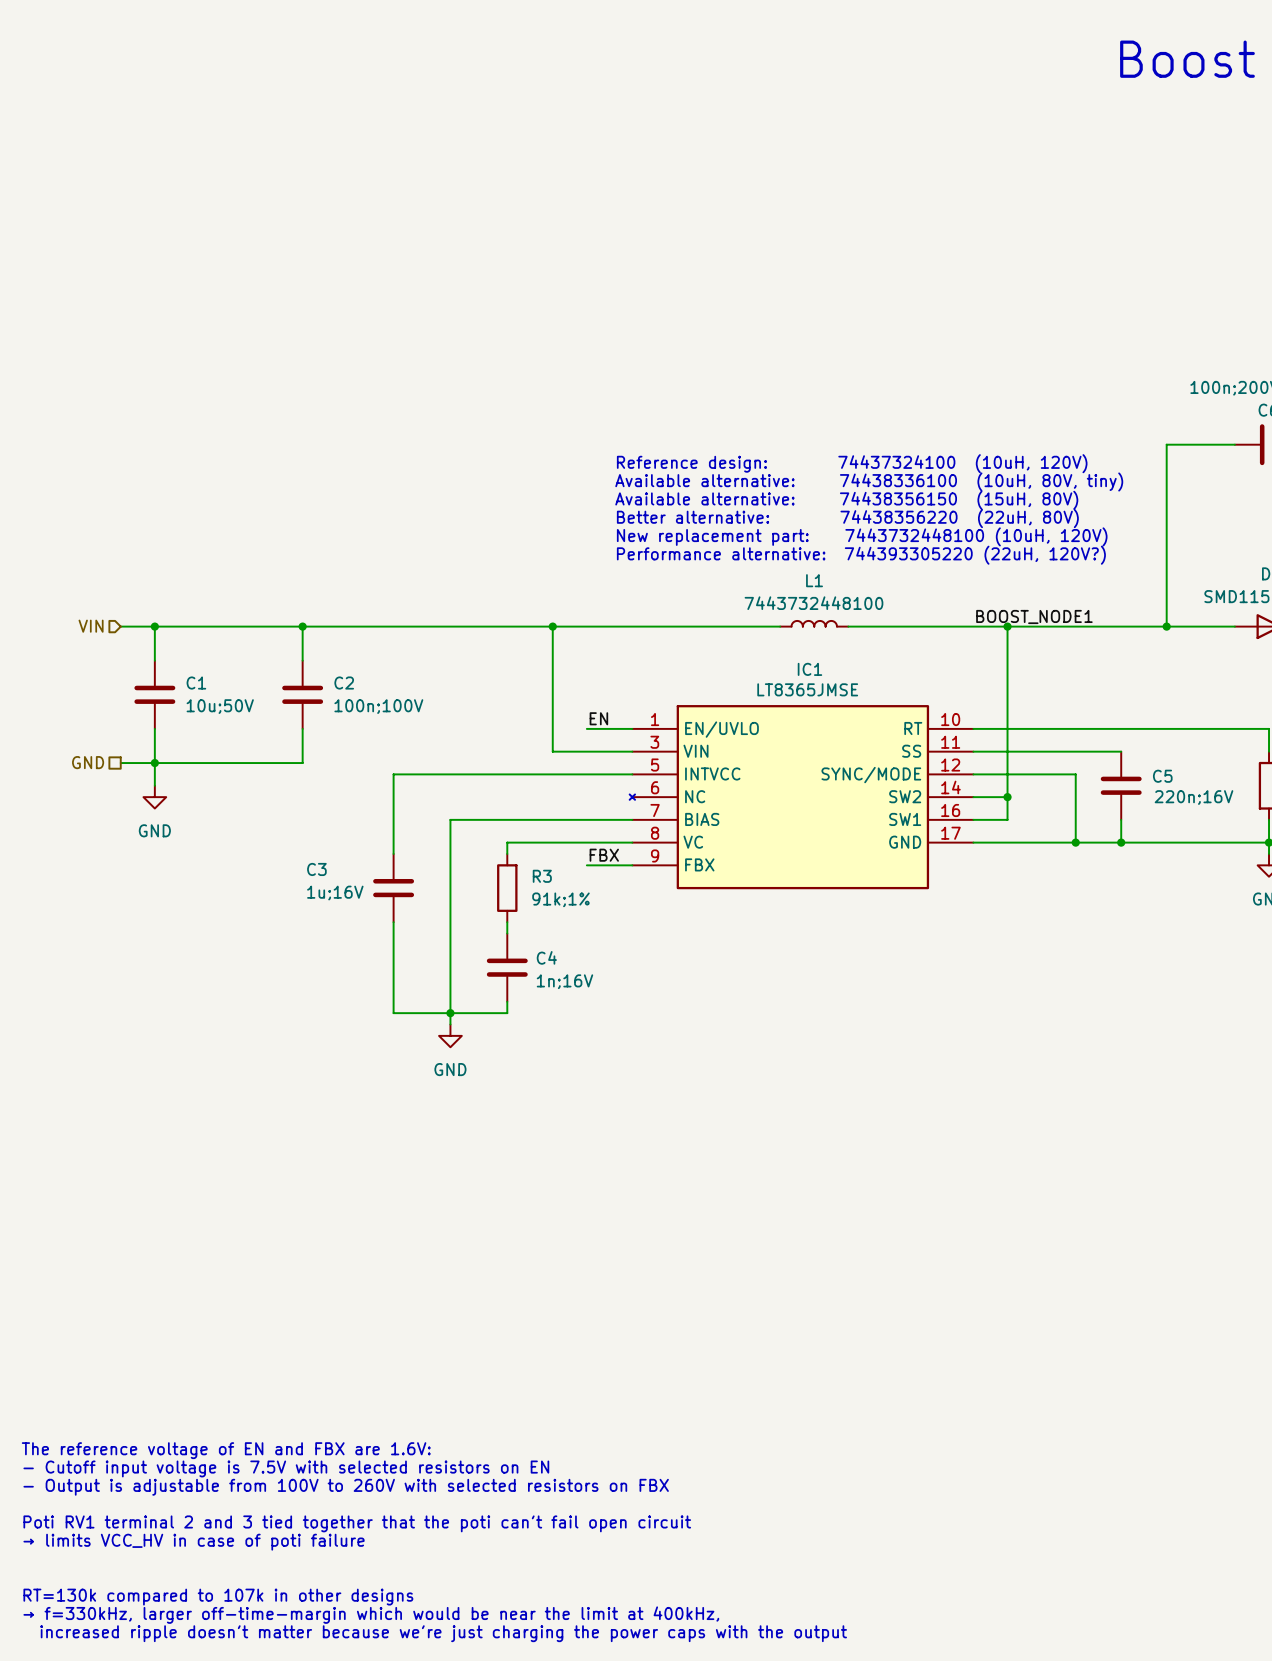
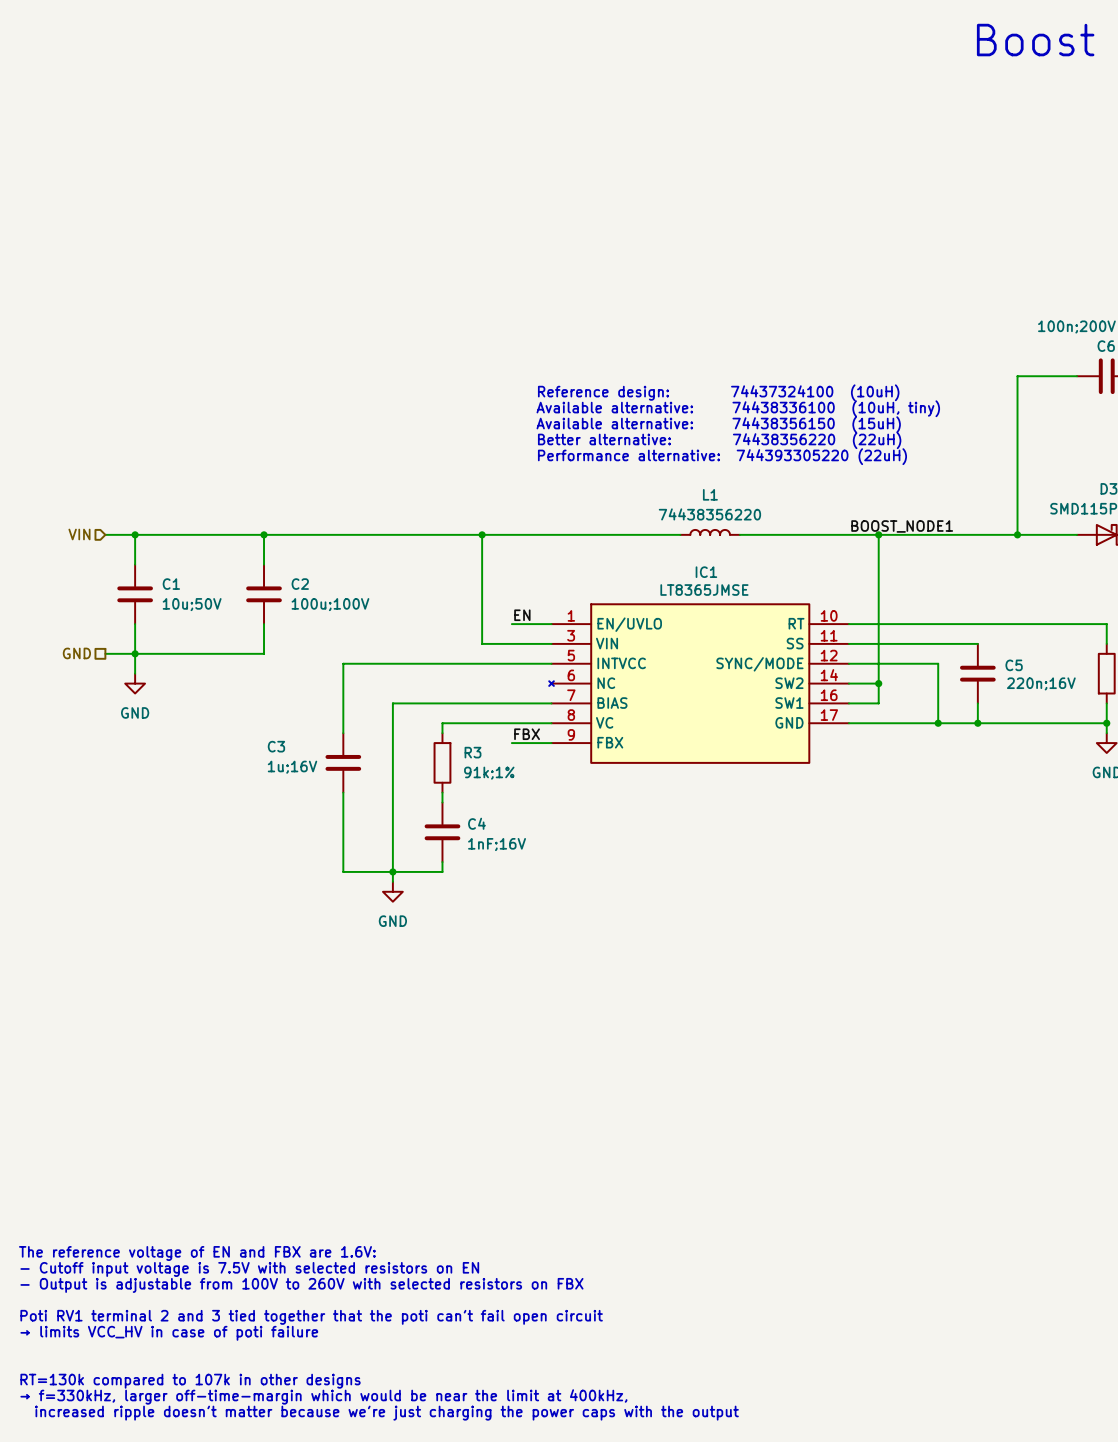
text: Reference design: 74437324100 (10uH, 120V) (852, 463) -> Reference design: 74437324100 (10uH) (718, 392)
text: Available alternative: 74438336100 (10uH, 80V, tiny) (869, 481) -> Available alternative: 74438336100 (10uH, tiny) (738, 408)
text: Available alternative: 74438356150 (15uH, 80V) (846, 500) -> Available alternative: 74438356150 (15uH) (718, 424)
text: Better alternative: 74438356220 (22uH, 80V) (847, 518) -> Better alternative: 74438356220 (22uH) (719, 440)
text: New replacement part: 7443732448100 (10uH, 120V) (862, 536) -> Performance alternative: 744393305220 (22uH) (722, 456)
text: Performance alternative: 744393305220 (22uH, 120V?) (861, 555) -> none
L1 value: 7443732448100 (813, 603) -> 74438356220 (709, 514)
C2 value: 100n;100V (378, 706) -> 100u;100V (330, 604)
C4 value: 1n;16V (564, 981) -> 1nF;16V (497, 844)

